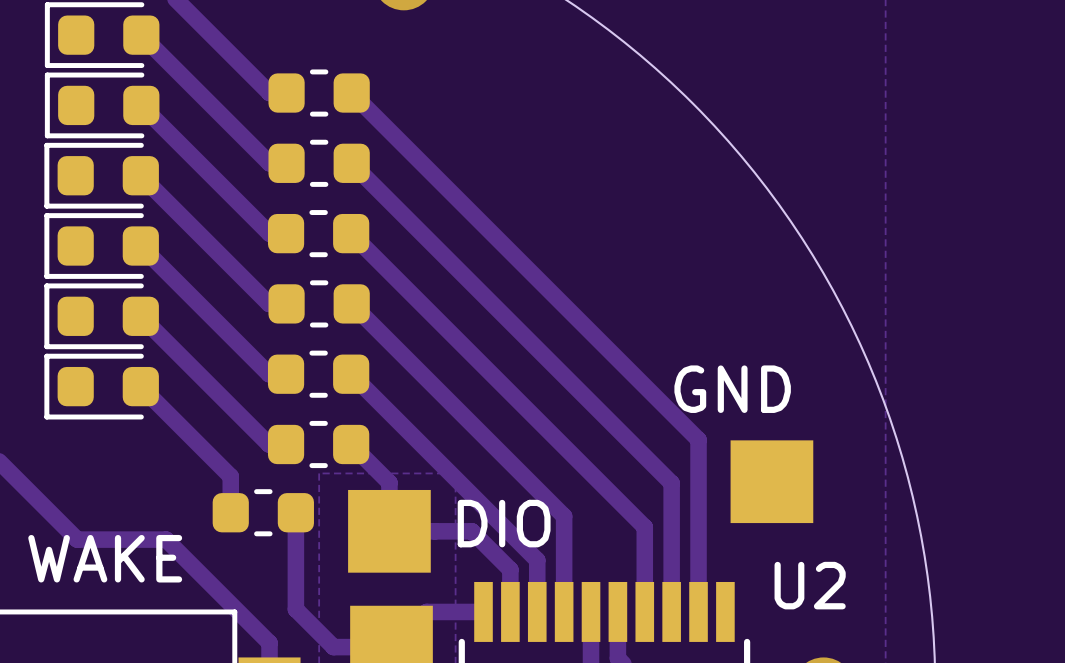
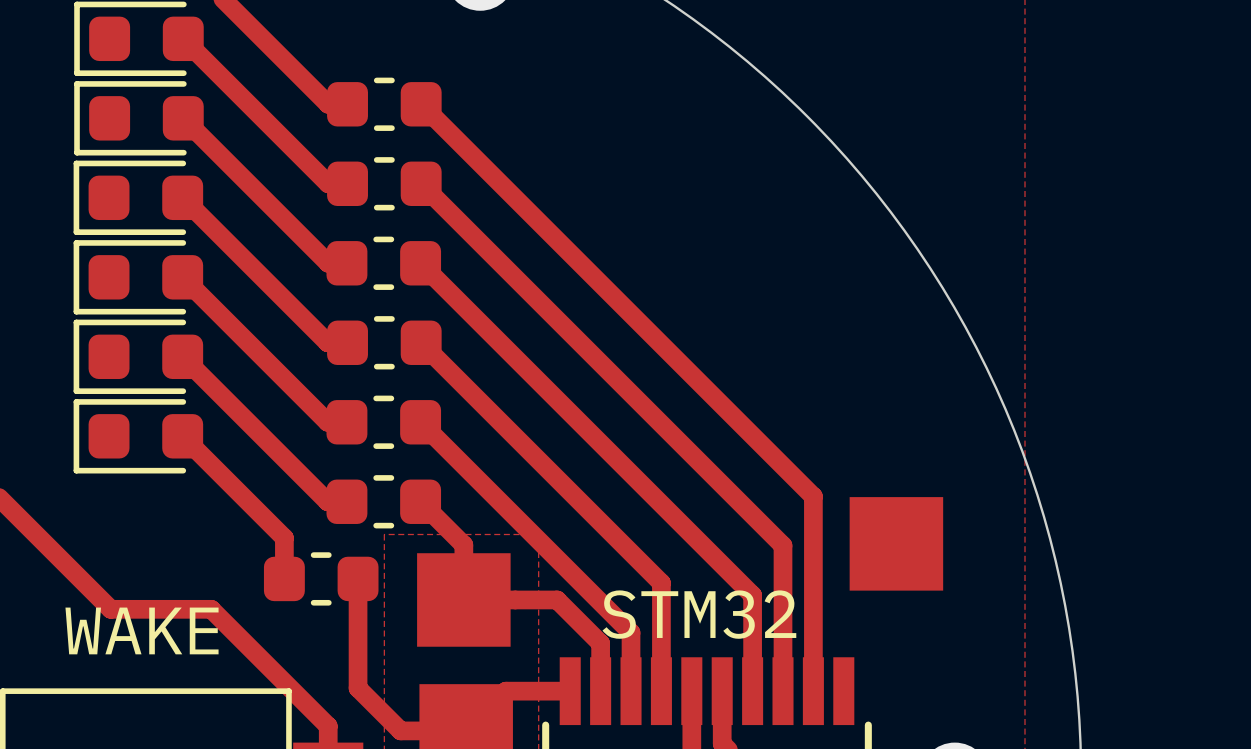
GND name: GND (732, 389) -> none
DIO name: DIO (504, 523) -> none
U2 name: U2 (810, 585) -> STM32 (699, 614)

